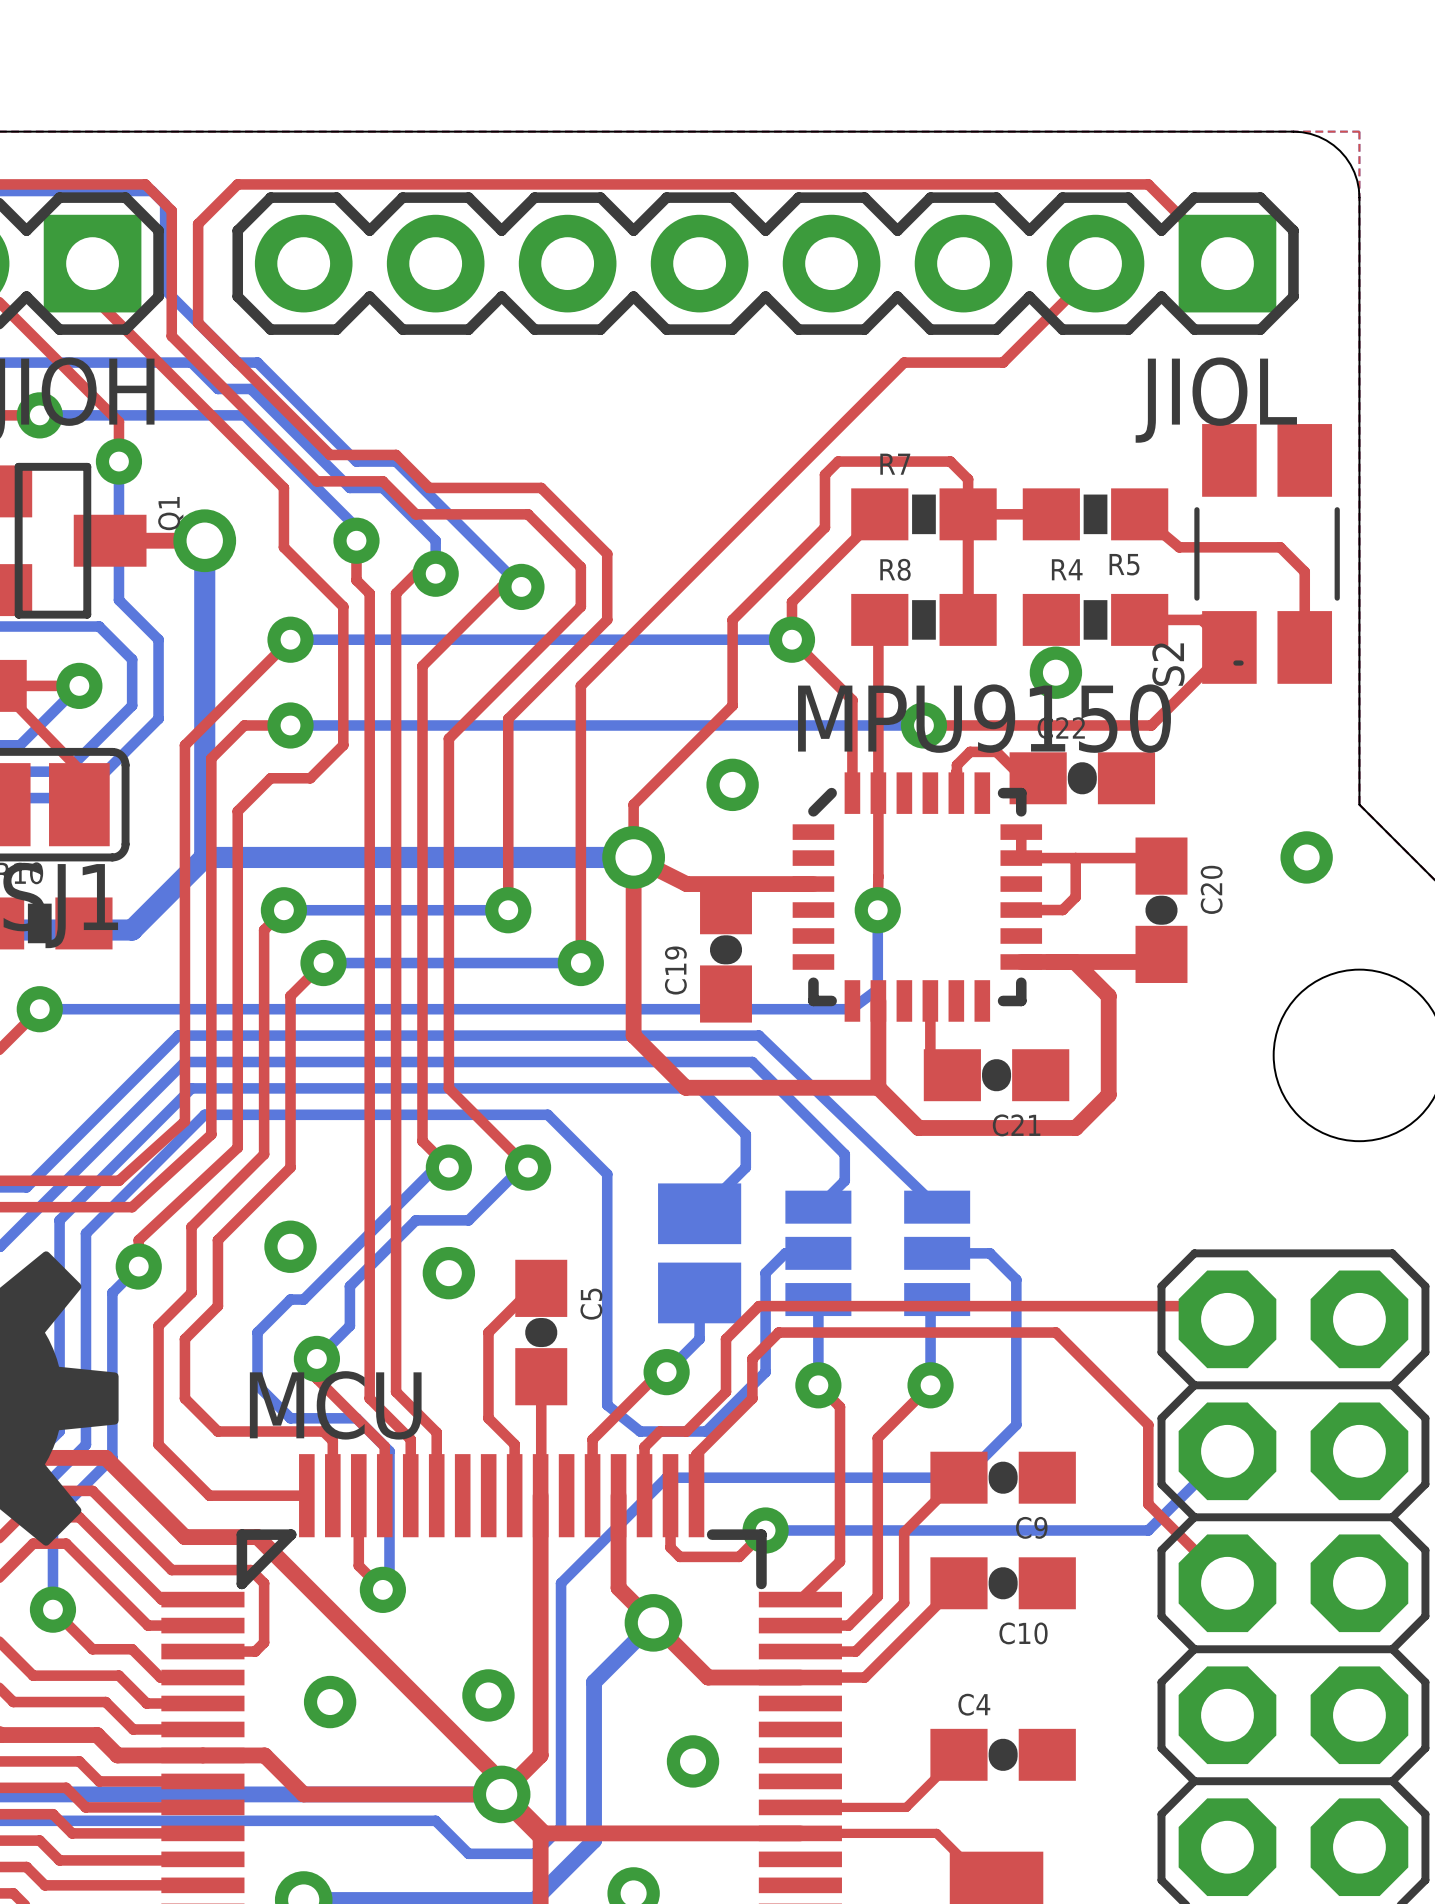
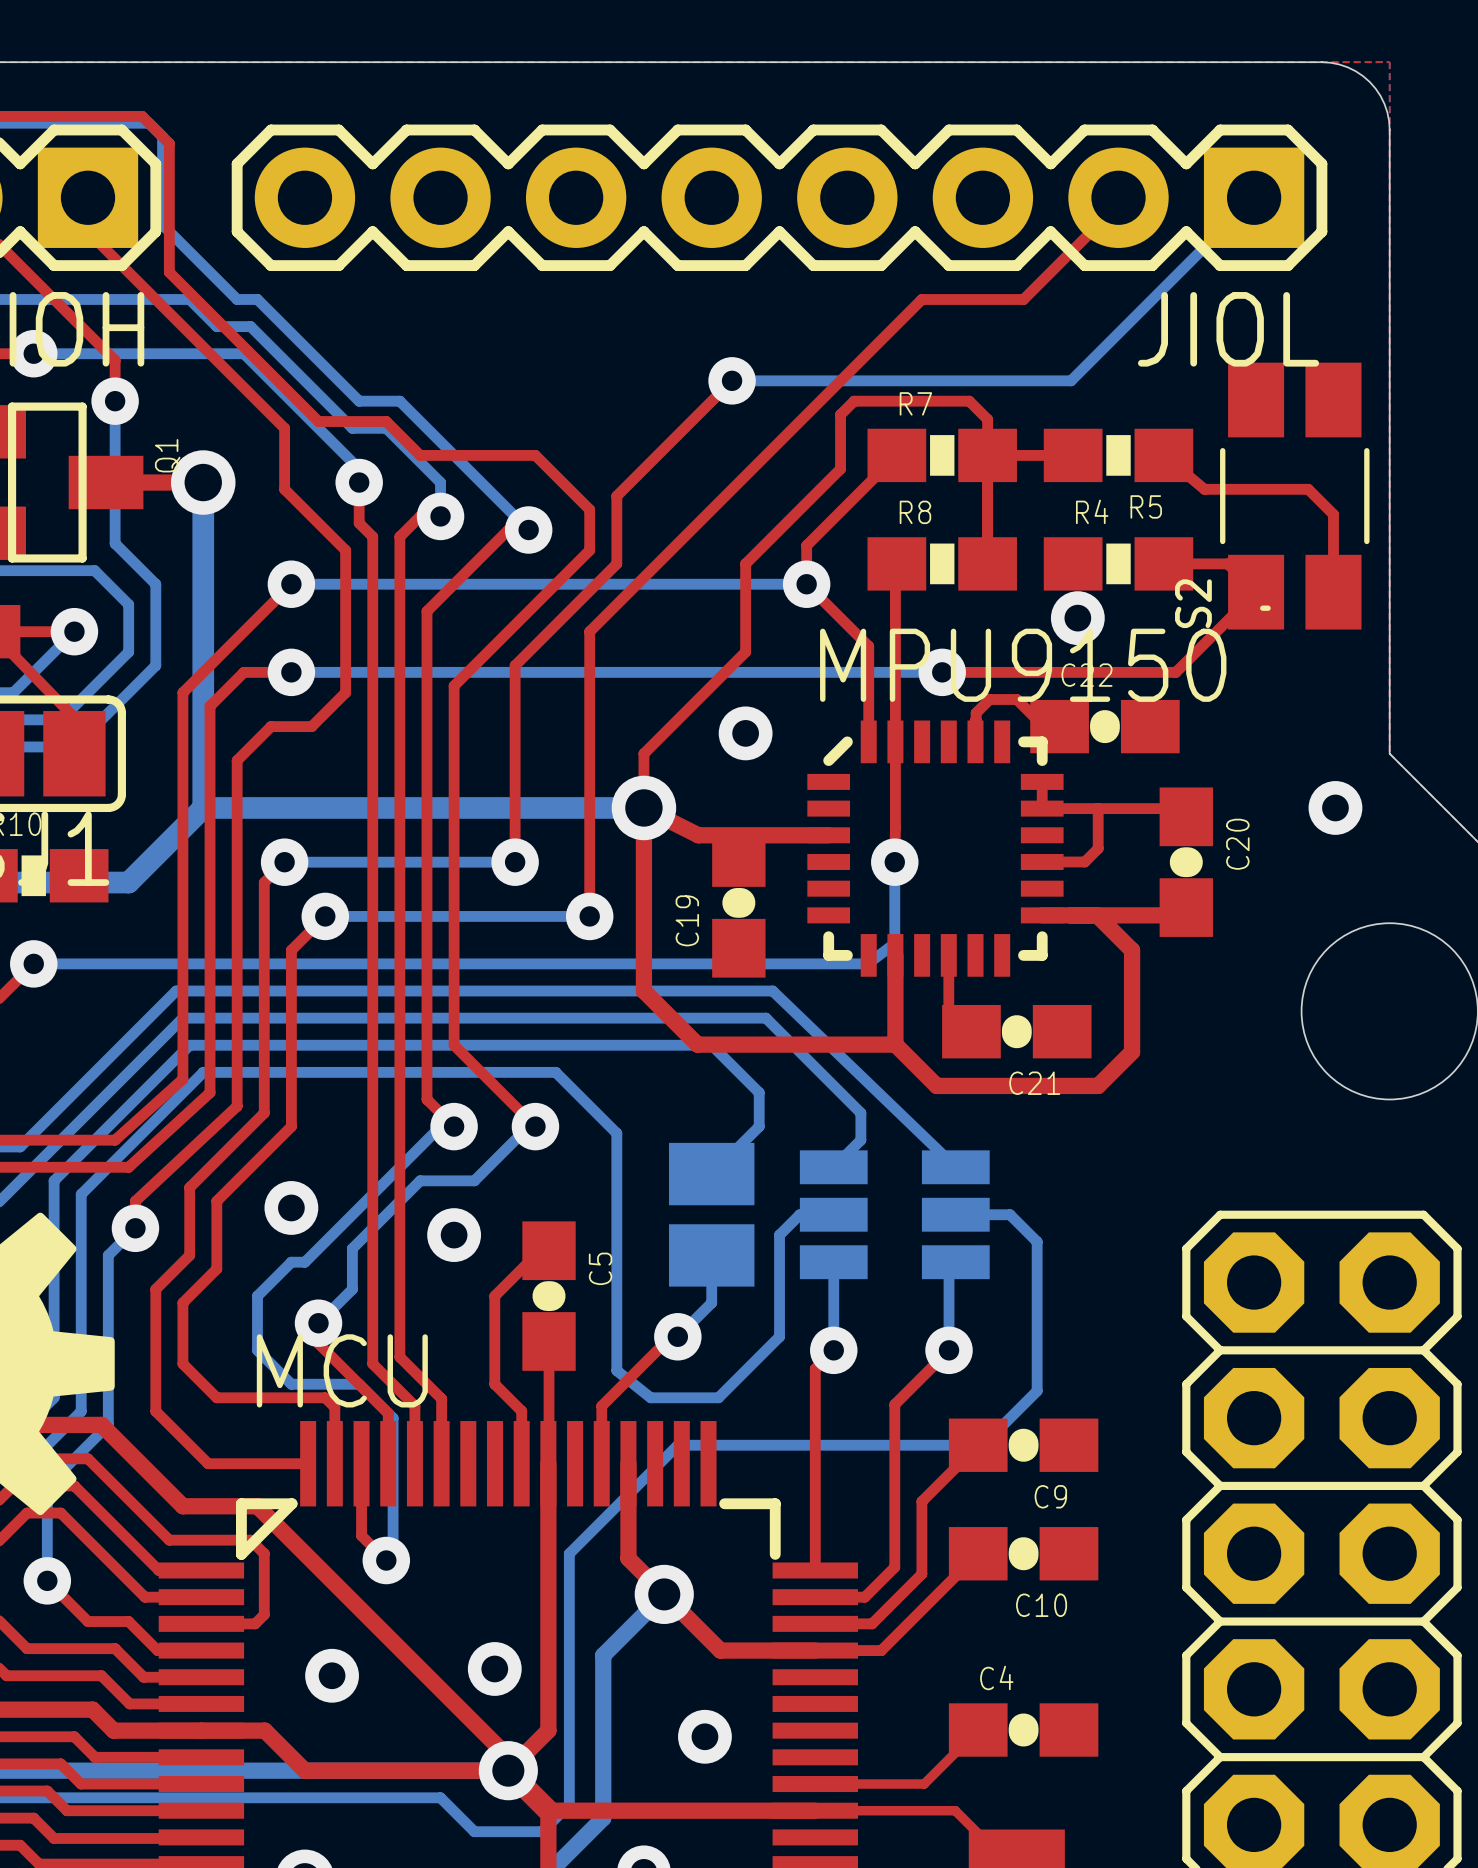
top track: (1227, 263) (1148, 184) (237, 184) (198, 224) (198, 322) (330, 454) (396, 454) (429, 487) (541, 487) (607, 553) -> (732, 380) (616, 496)
bottom track: none -> (1254, 197) (1071, 380) (732, 380)
via: none -> (732, 380)
top track: (1227, 1319) (1214, 1306) (759, 1306) (726, 1339) (726, 1391) (686, 1431) (660, 1431) (644, 1446) (644, 1495) -> none
top track: (818, 1385) (839, 1406) (839, 1561) (800, 1599) -> (833, 1350) (815, 1368) (815, 1570)
bottom track: (1227, 1451) (1148, 1530) (765, 1530) -> none
top track: (670, 1495) (670, 1547) (679, 1556) (739, 1556) (765, 1530) -> none
top track: (696, 1495) (696, 1454) (752, 1398) (752, 1358) (778, 1332) (1055, 1332) (1148, 1424) (1148, 1504) (1227, 1583) -> none
via: (765, 1530) -> none

